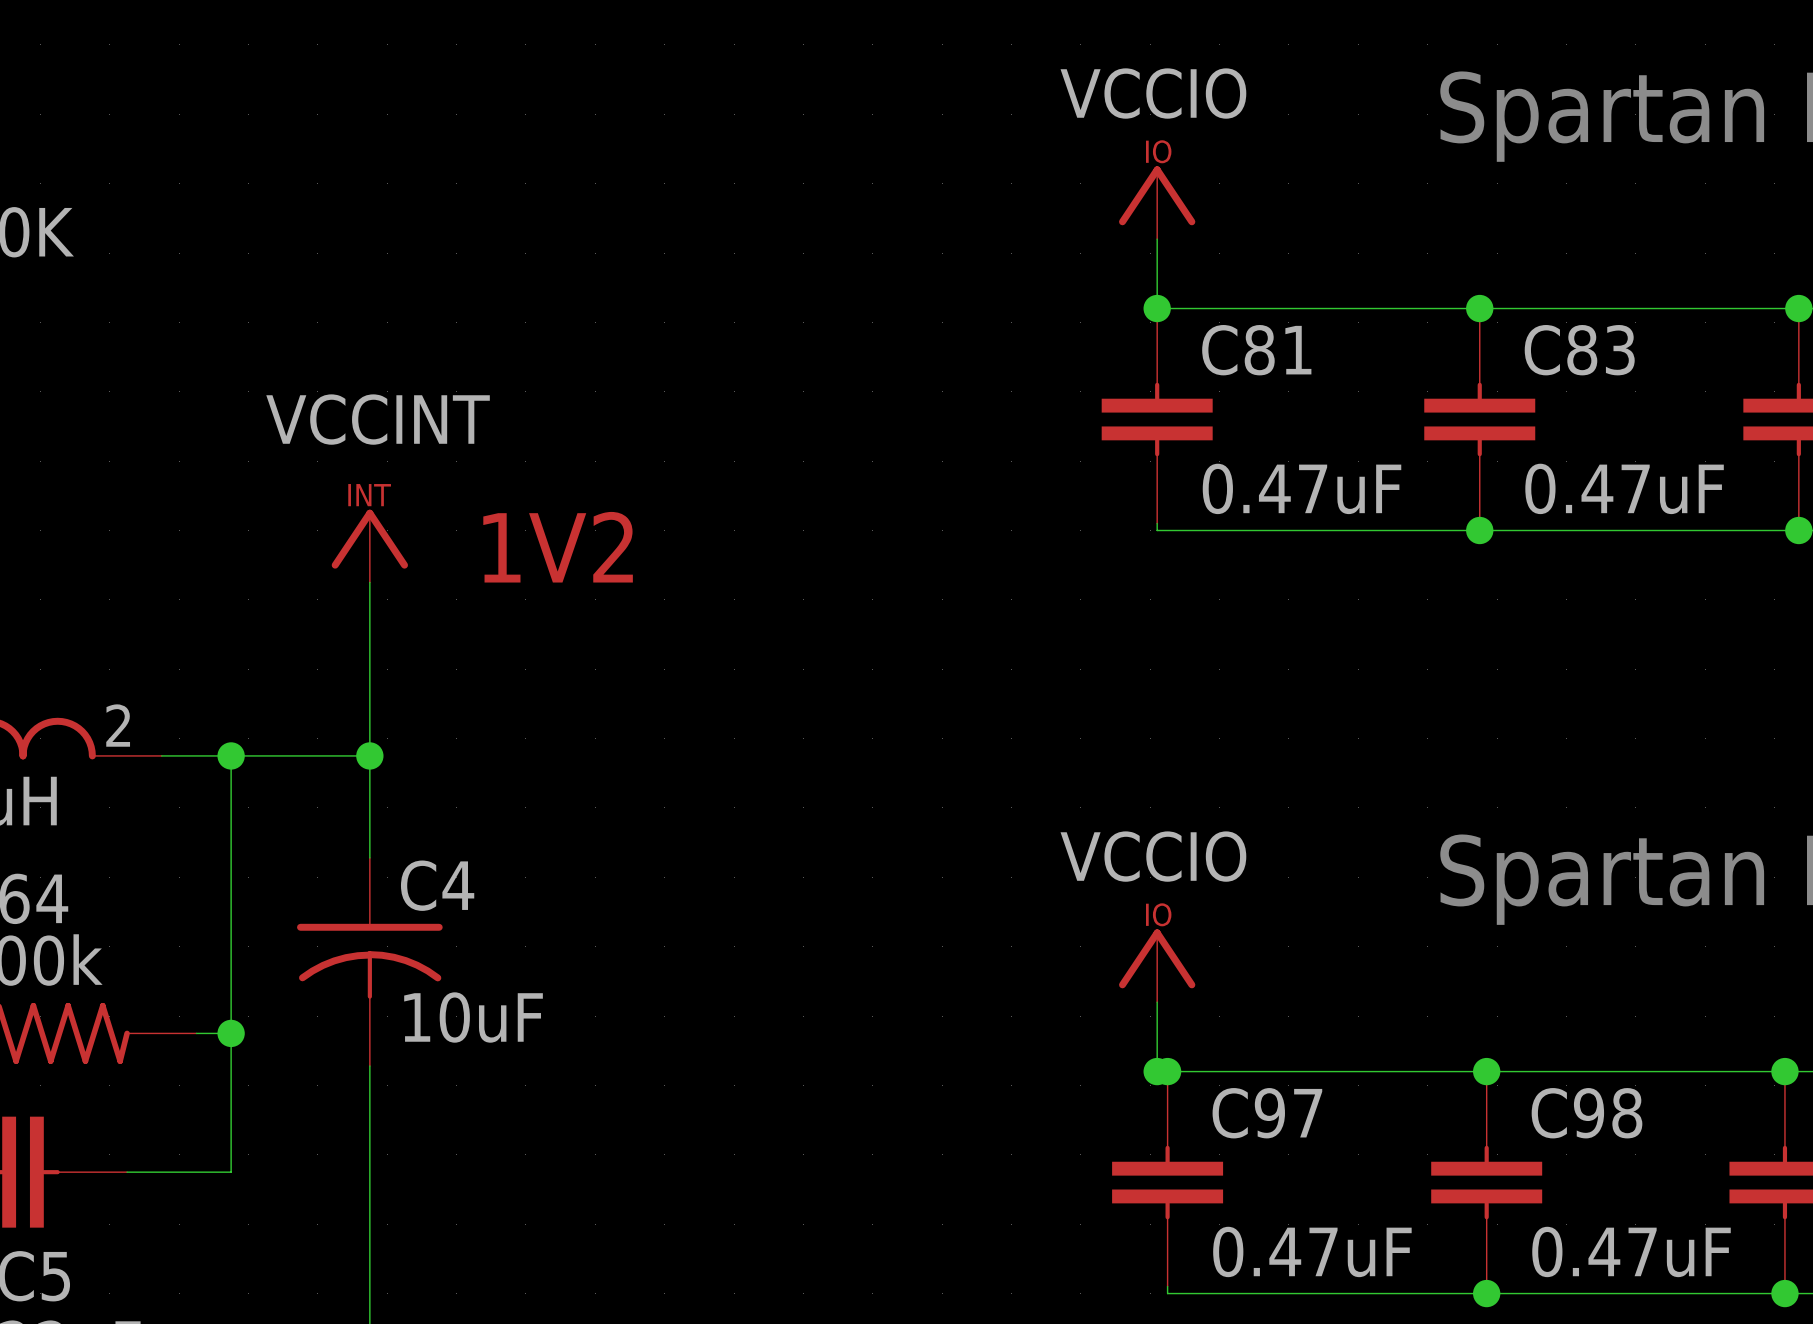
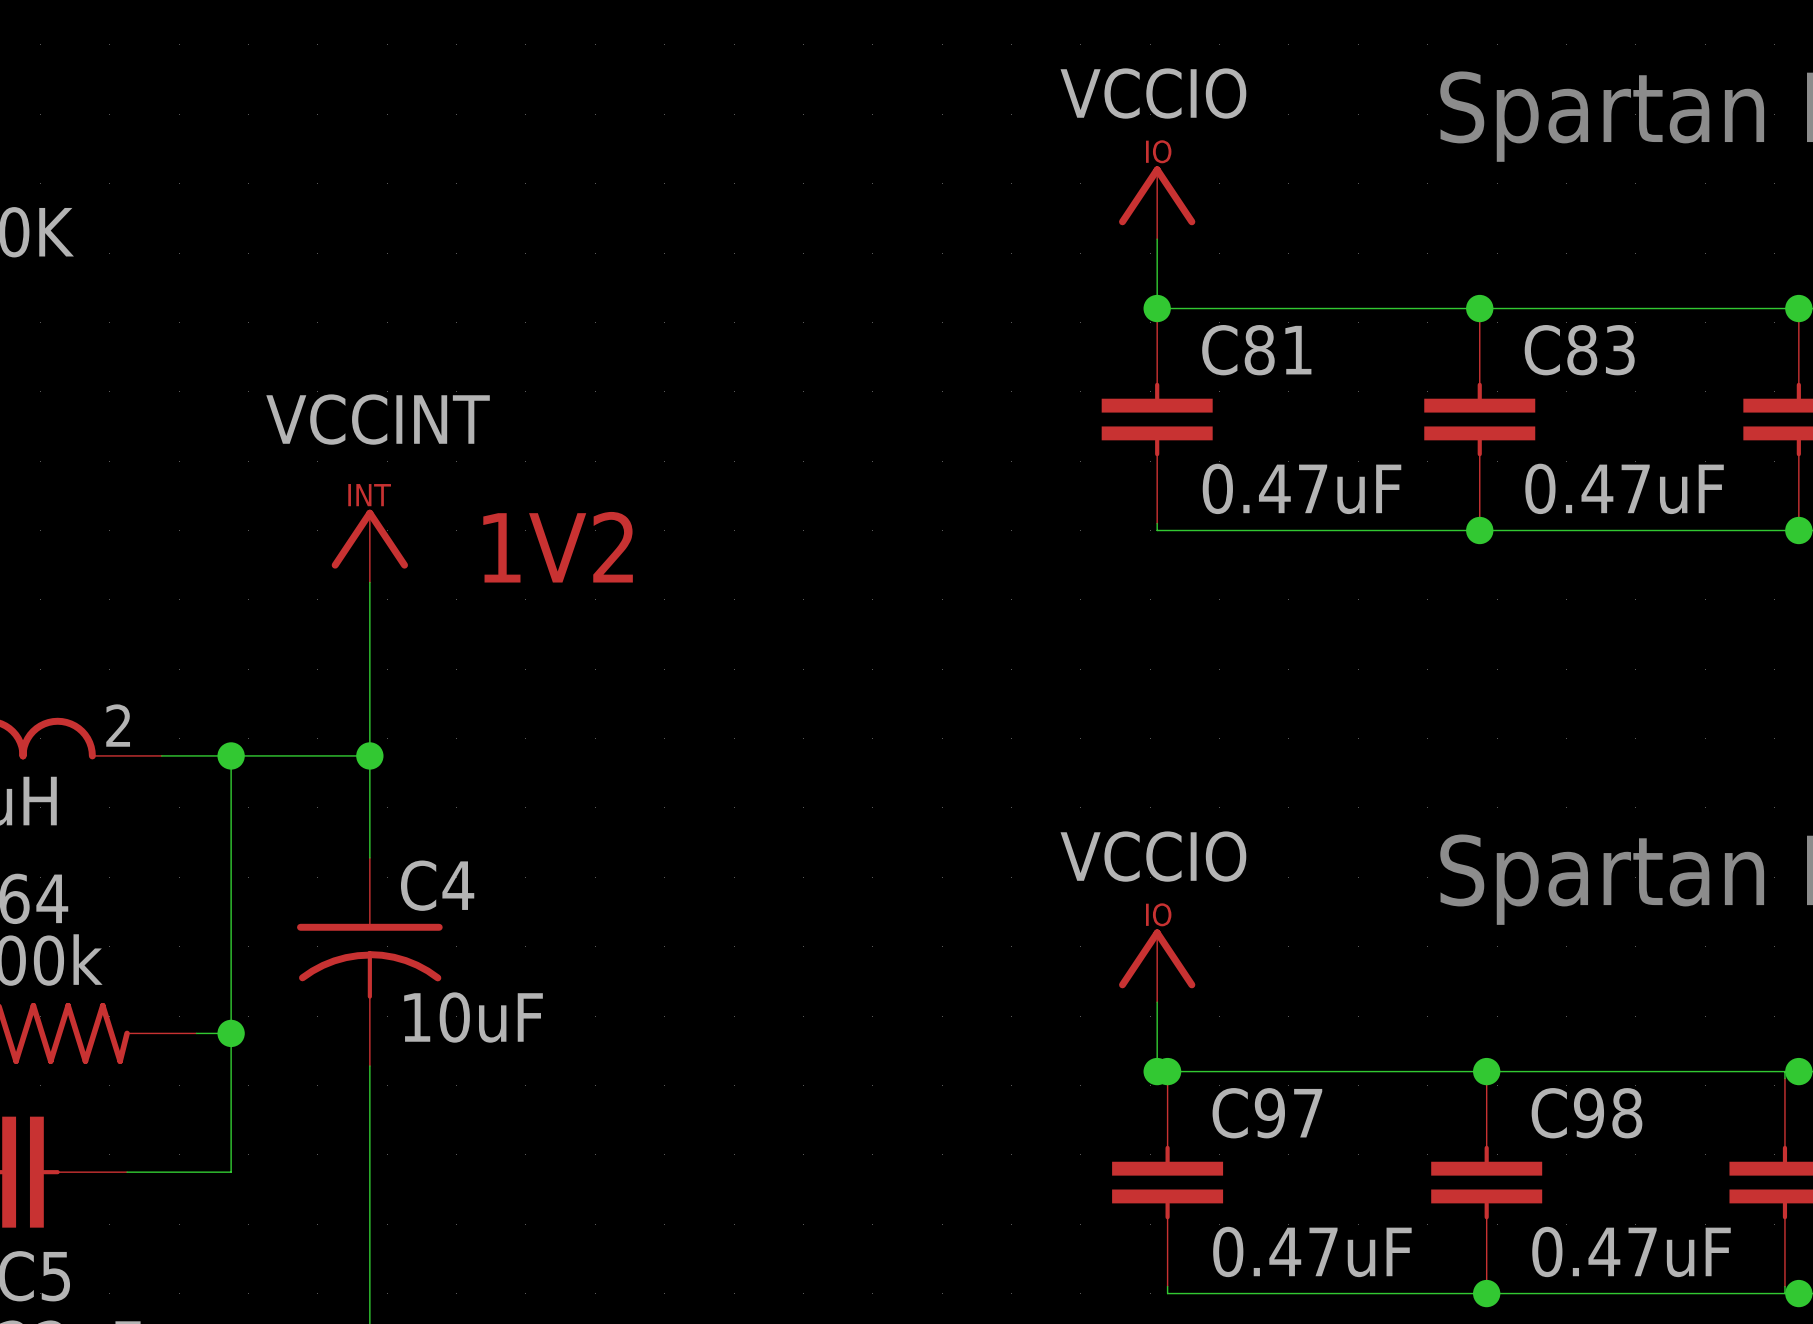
junction position: (1784, 1071) -> (1798, 1071)
junction position: (1784, 1293) -> (1798, 1293)

